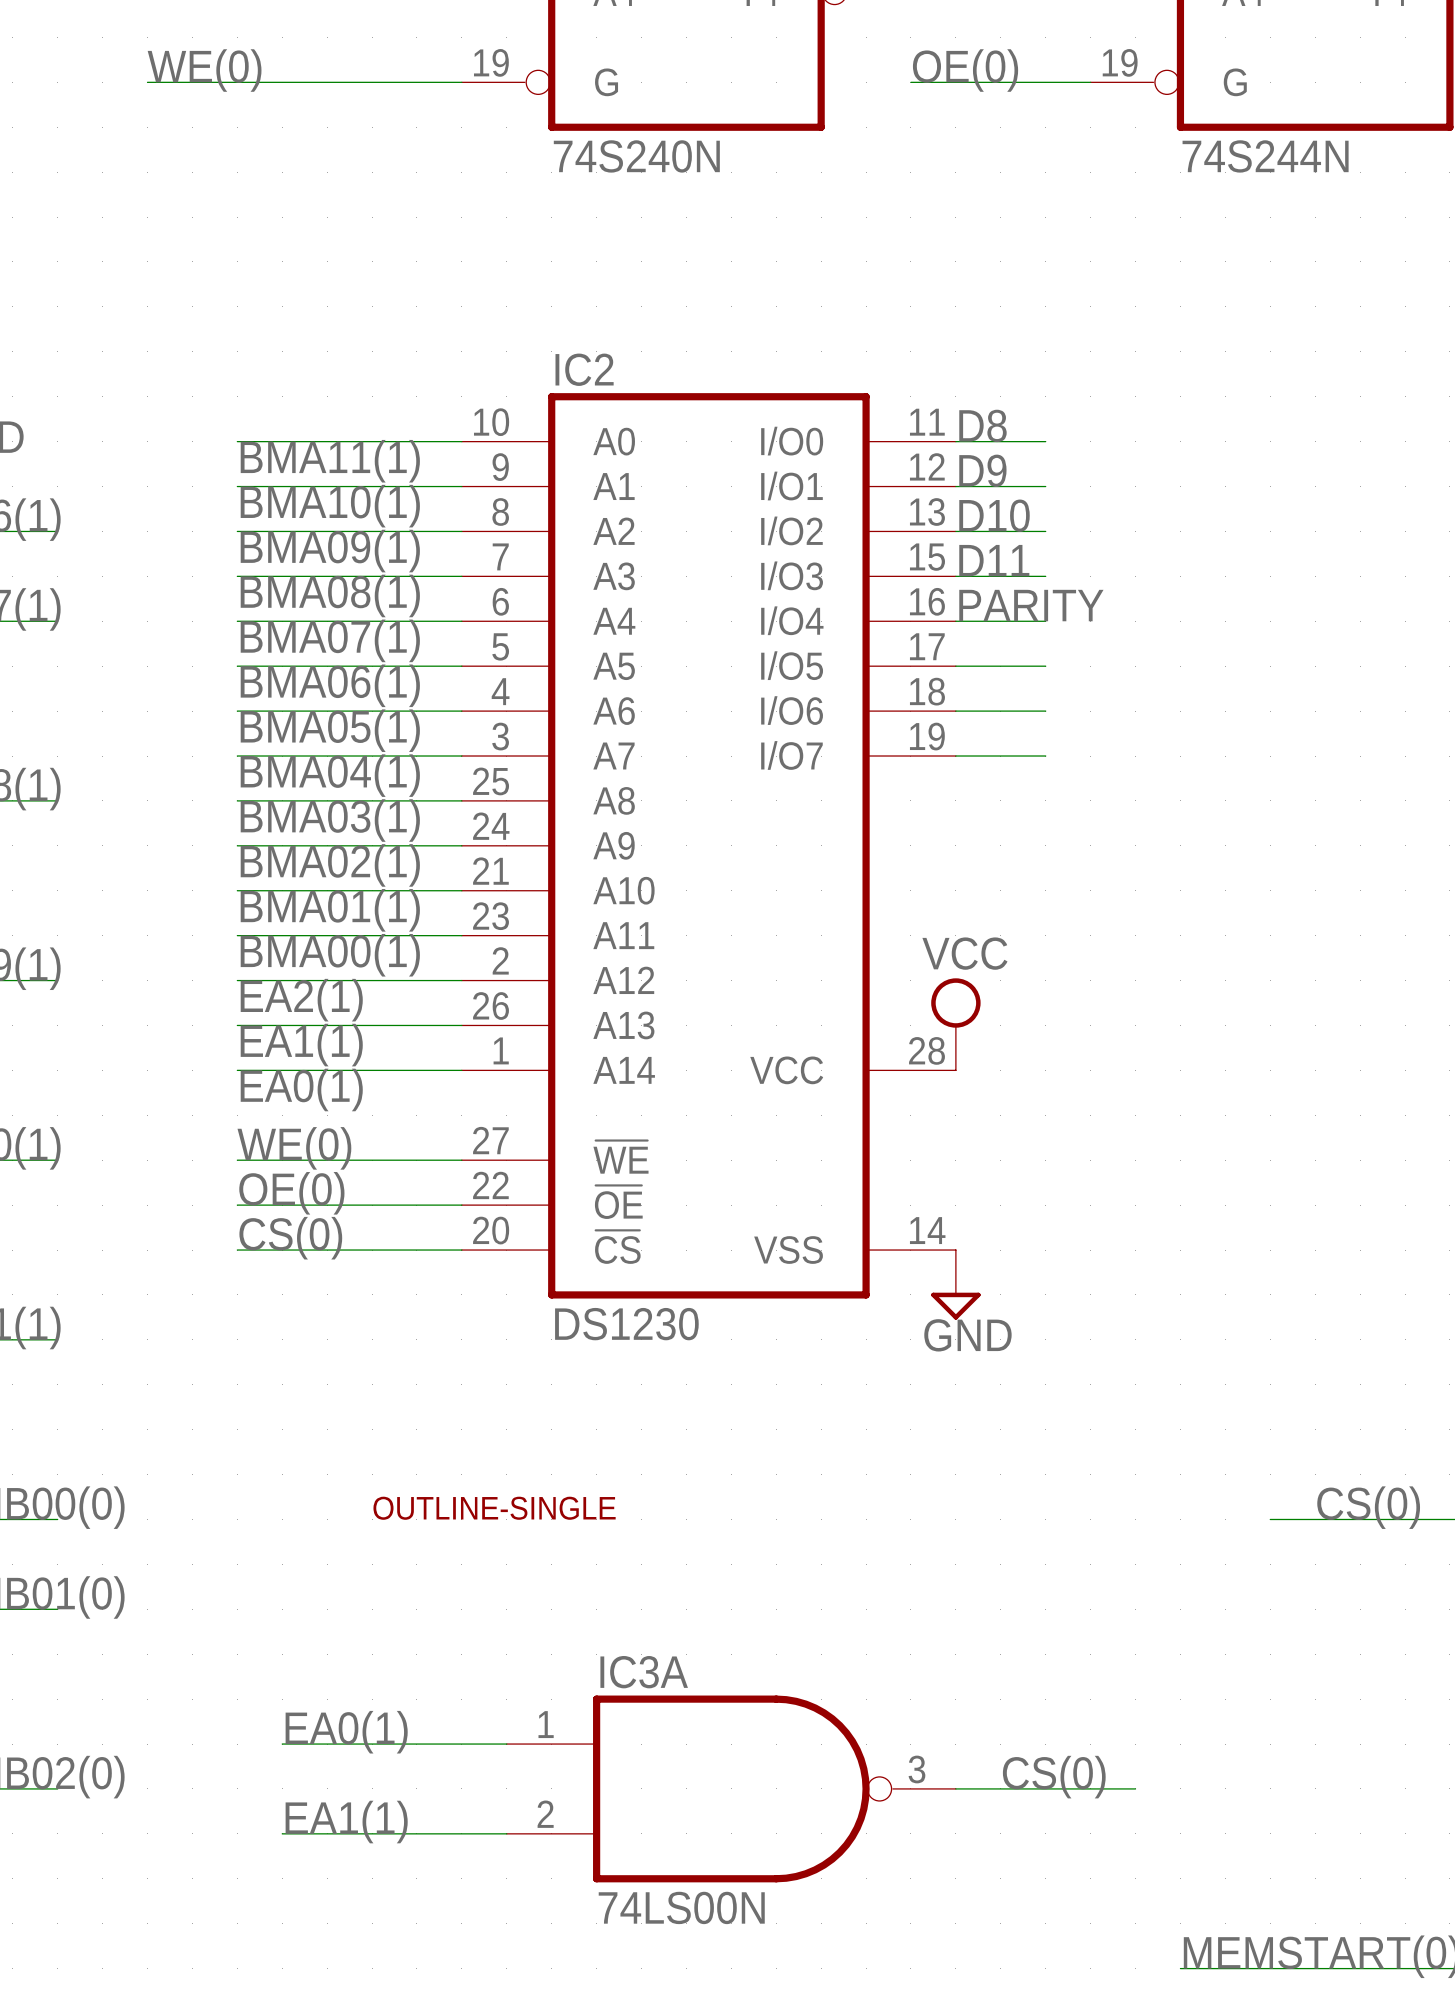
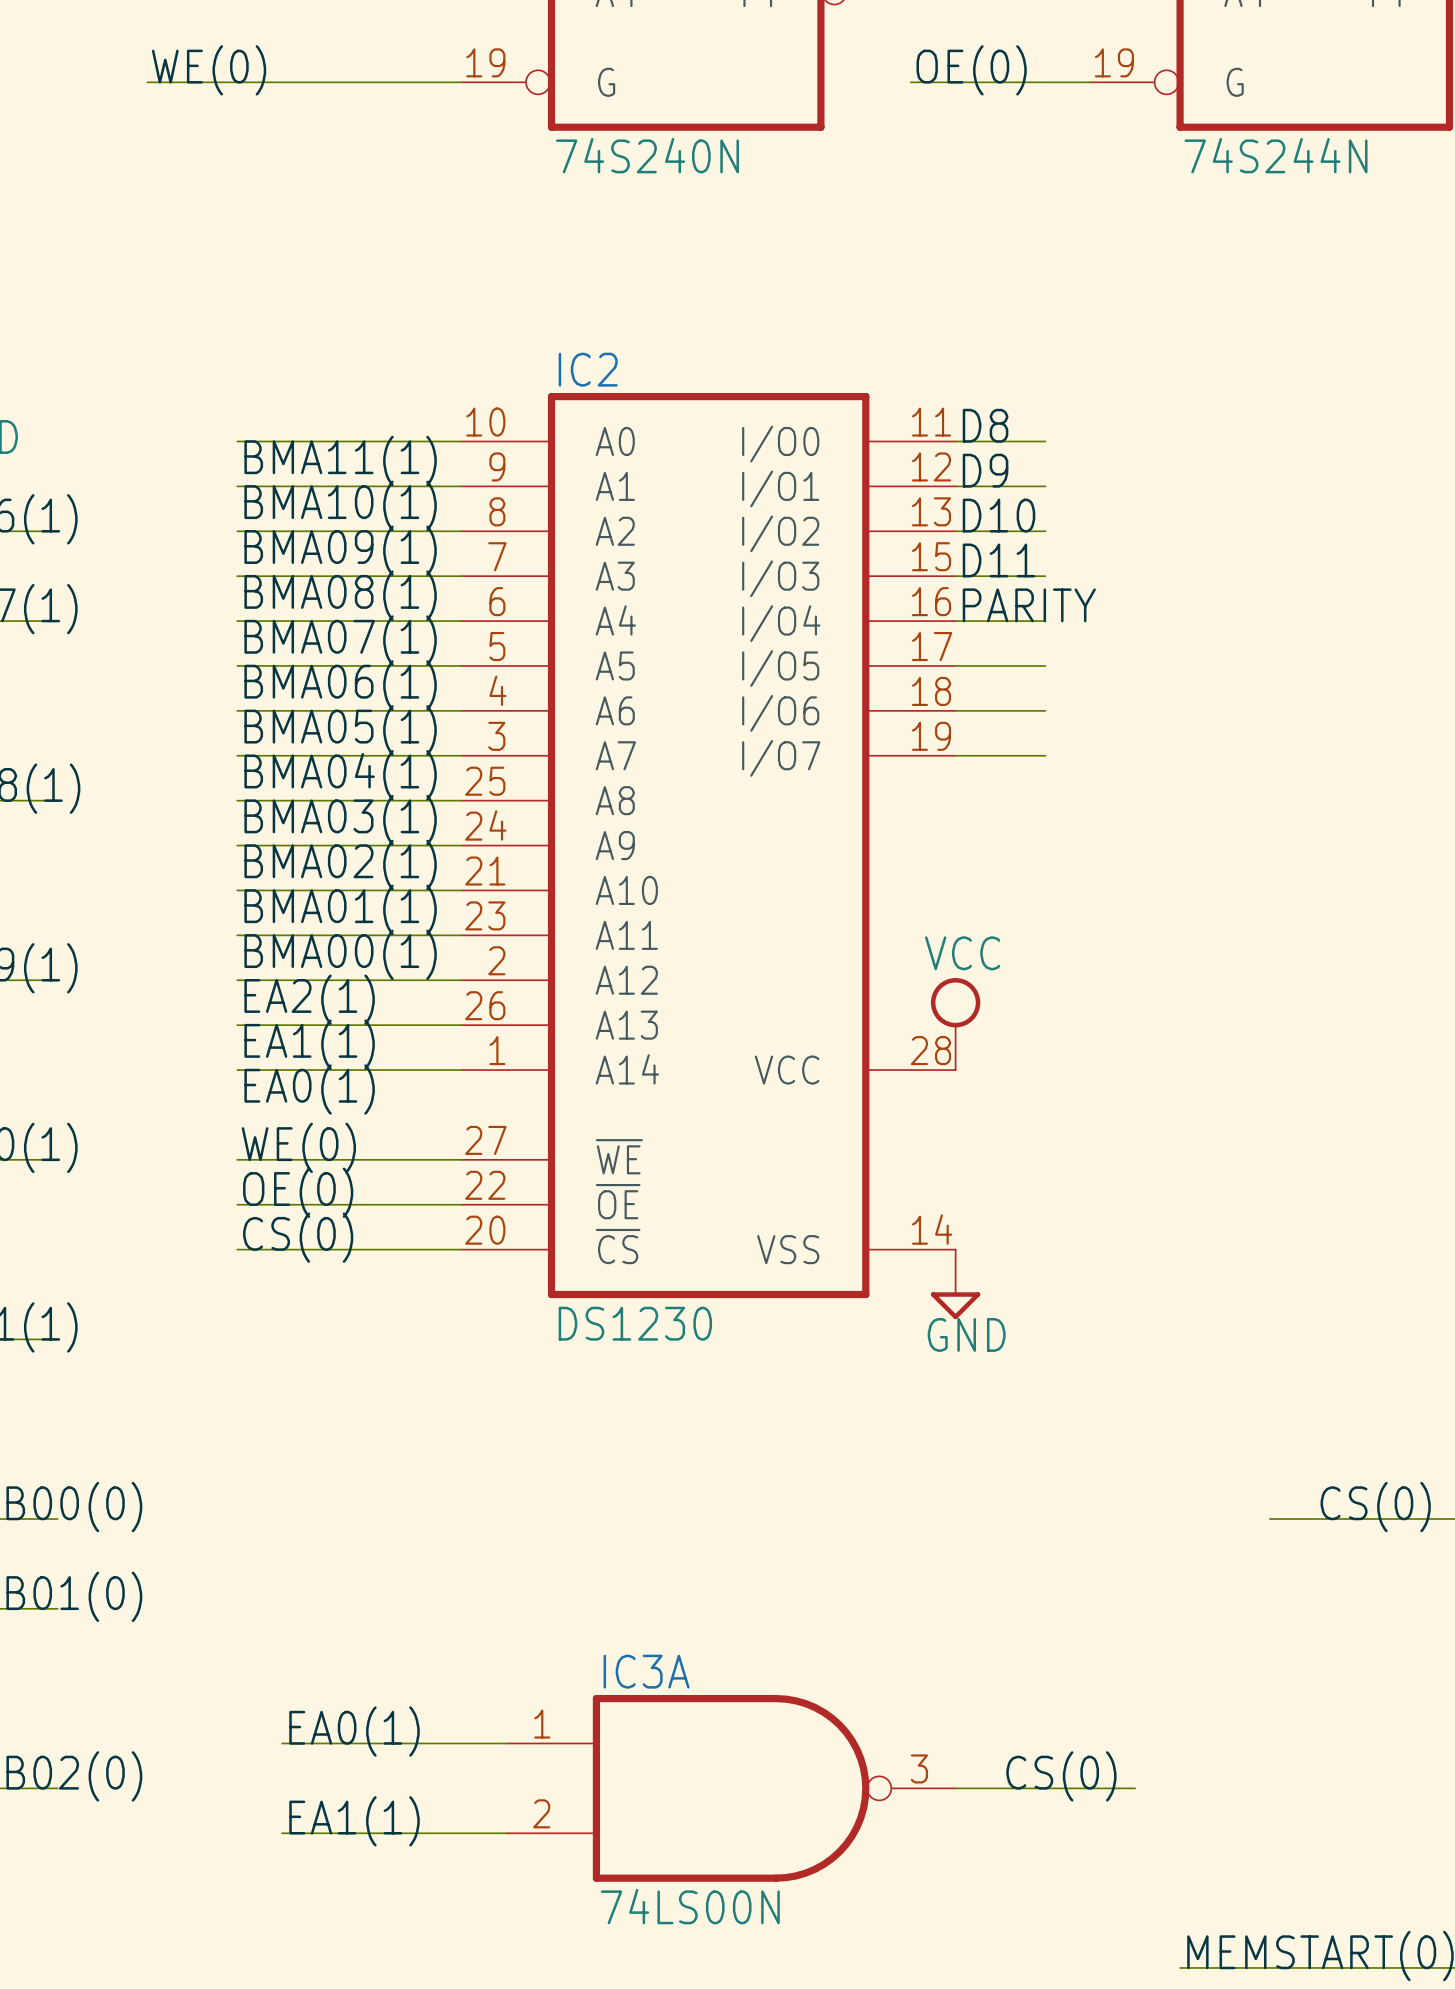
part: OUTLINE-SINGLE (494, 1508) -> none

